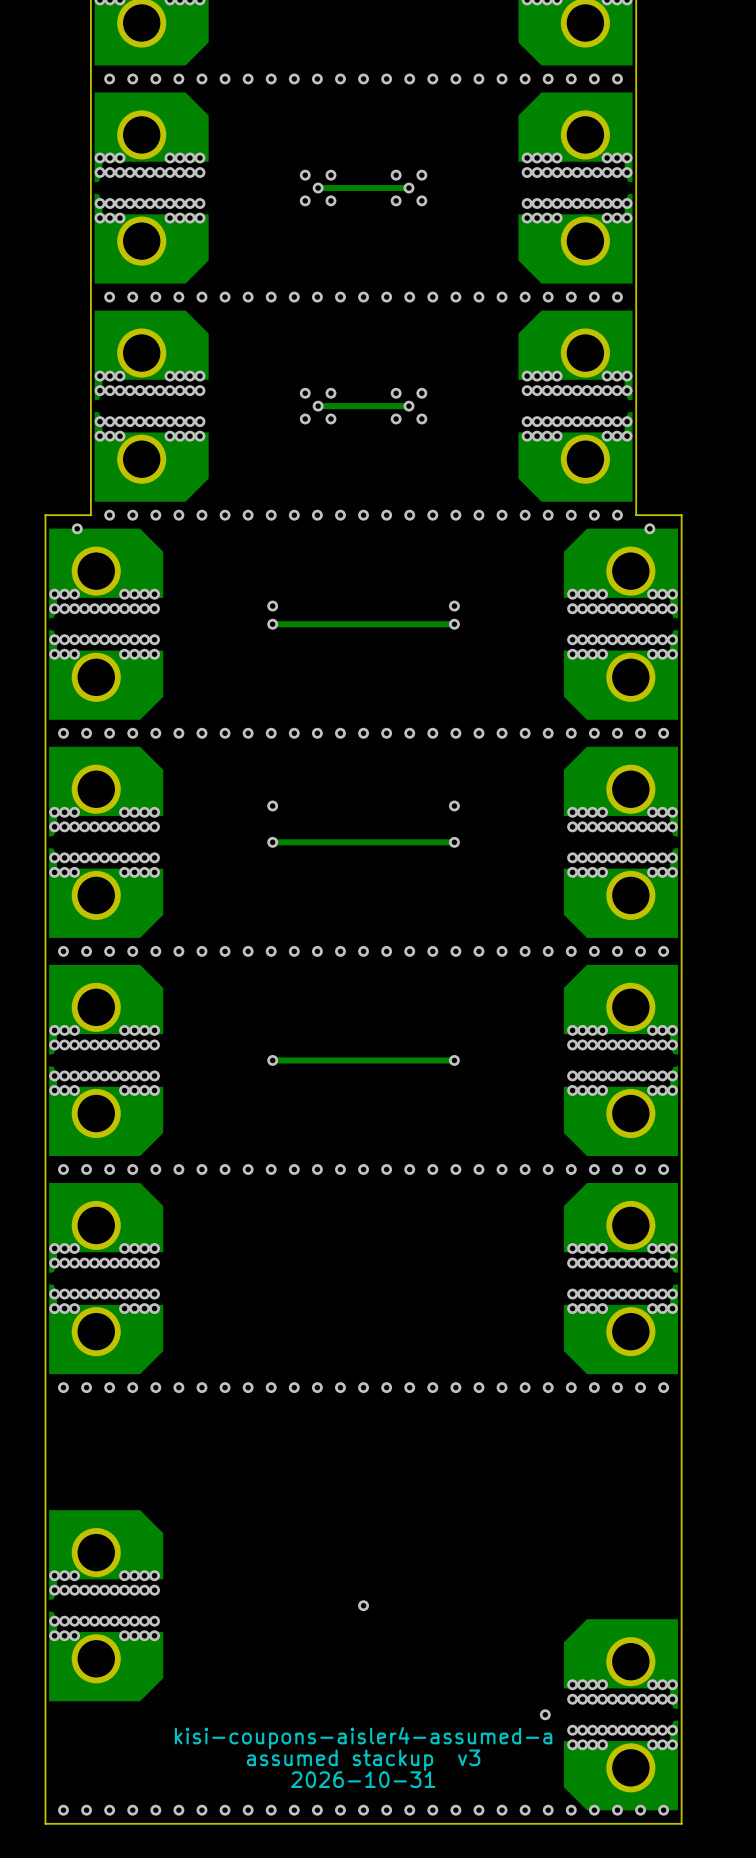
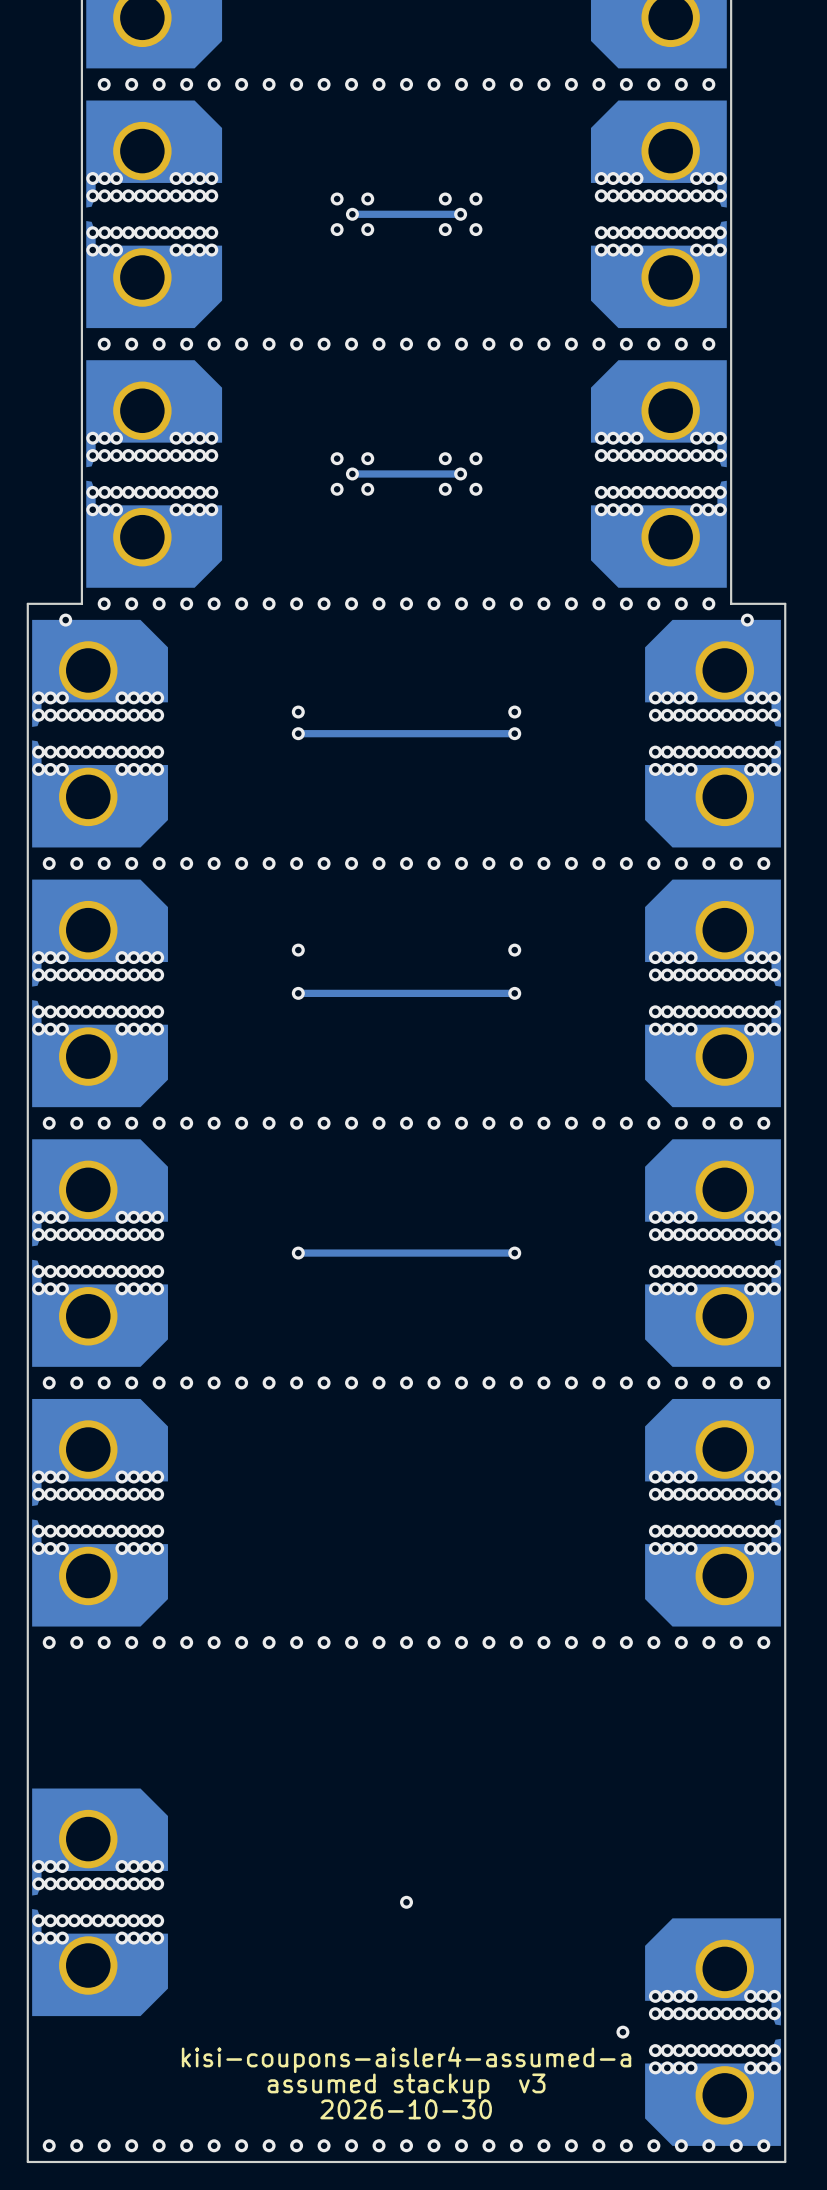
text: 2026-10-31 (363, 1779) -> 2026-10-30 (406, 2109)

